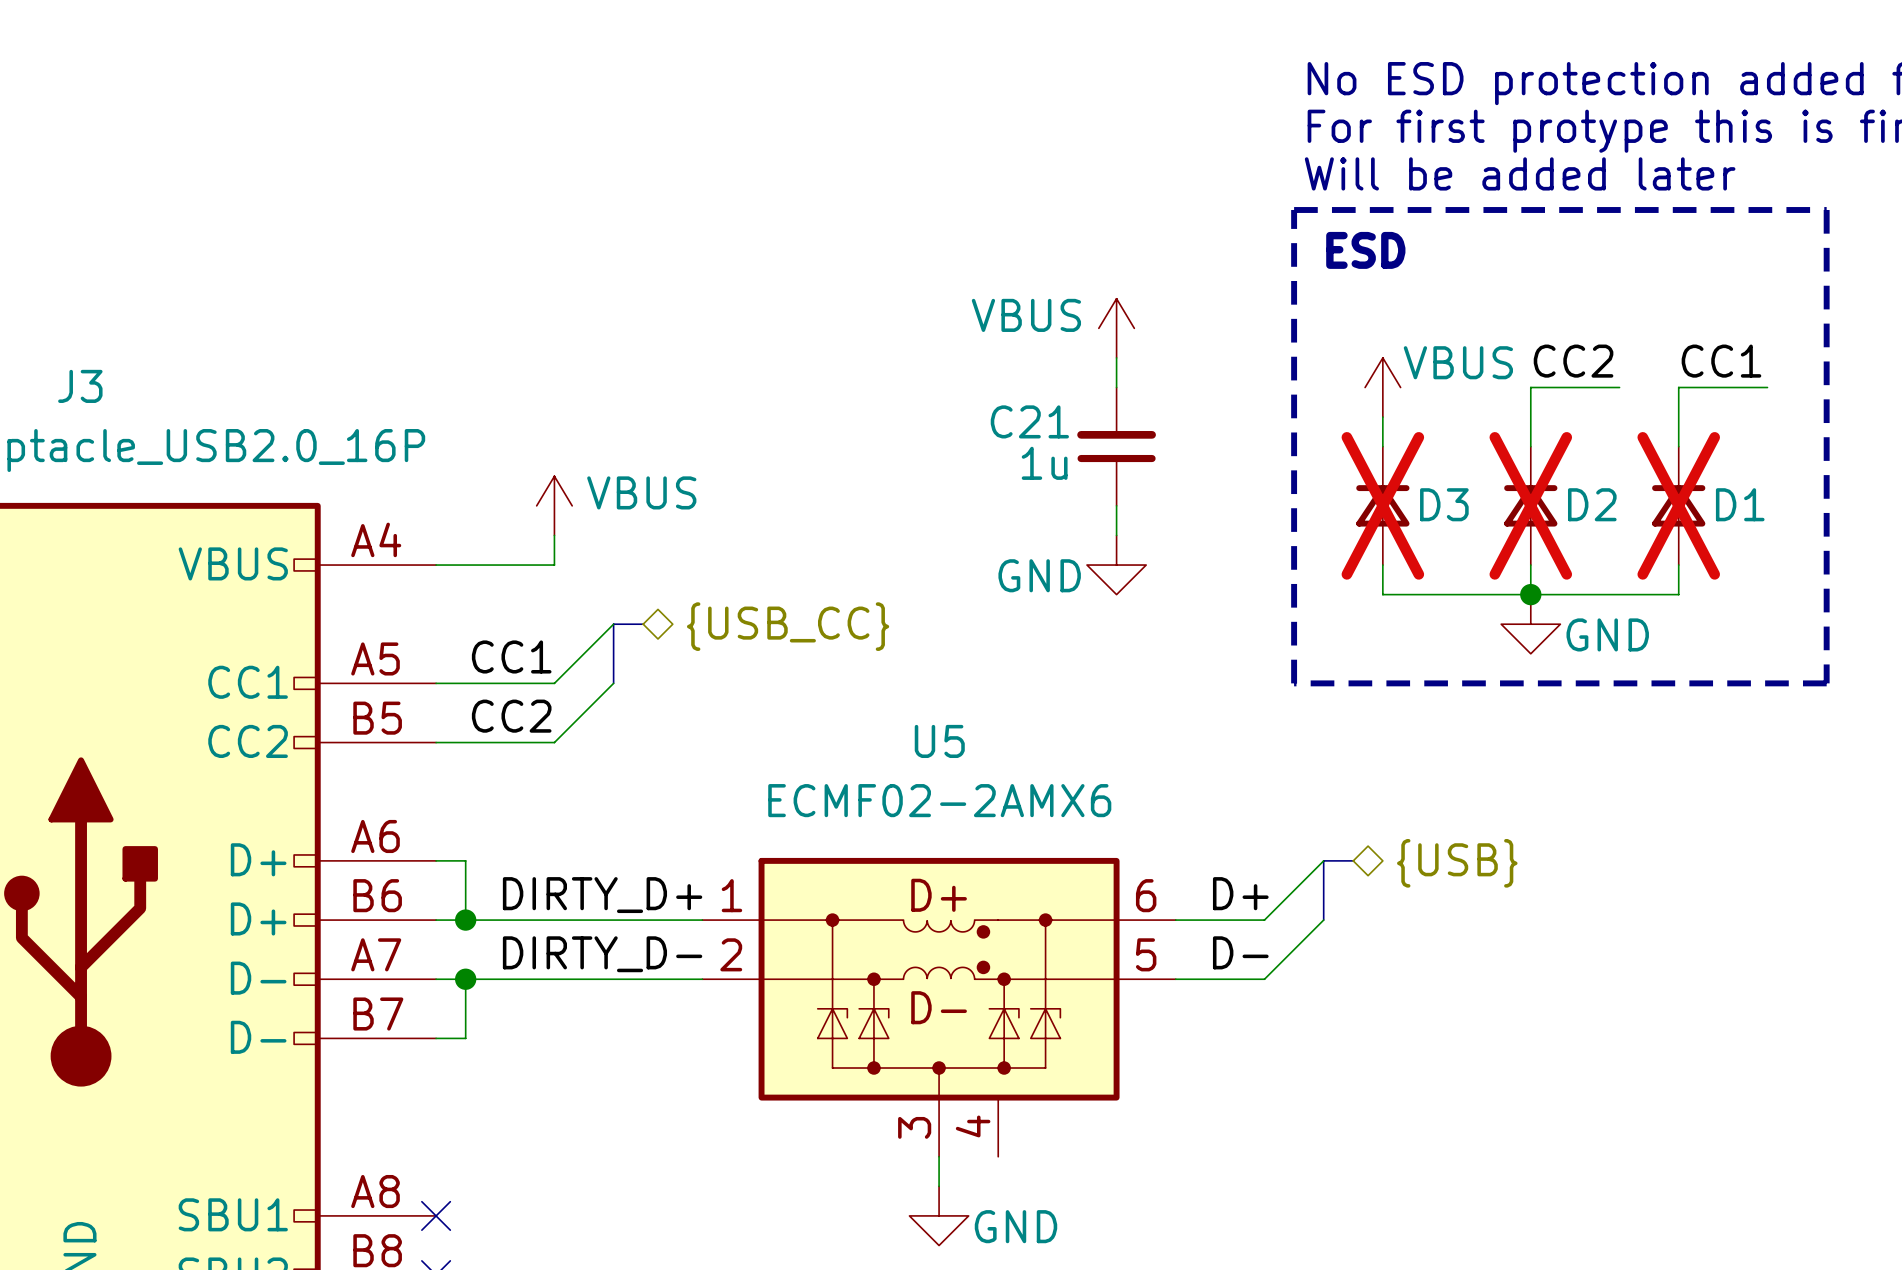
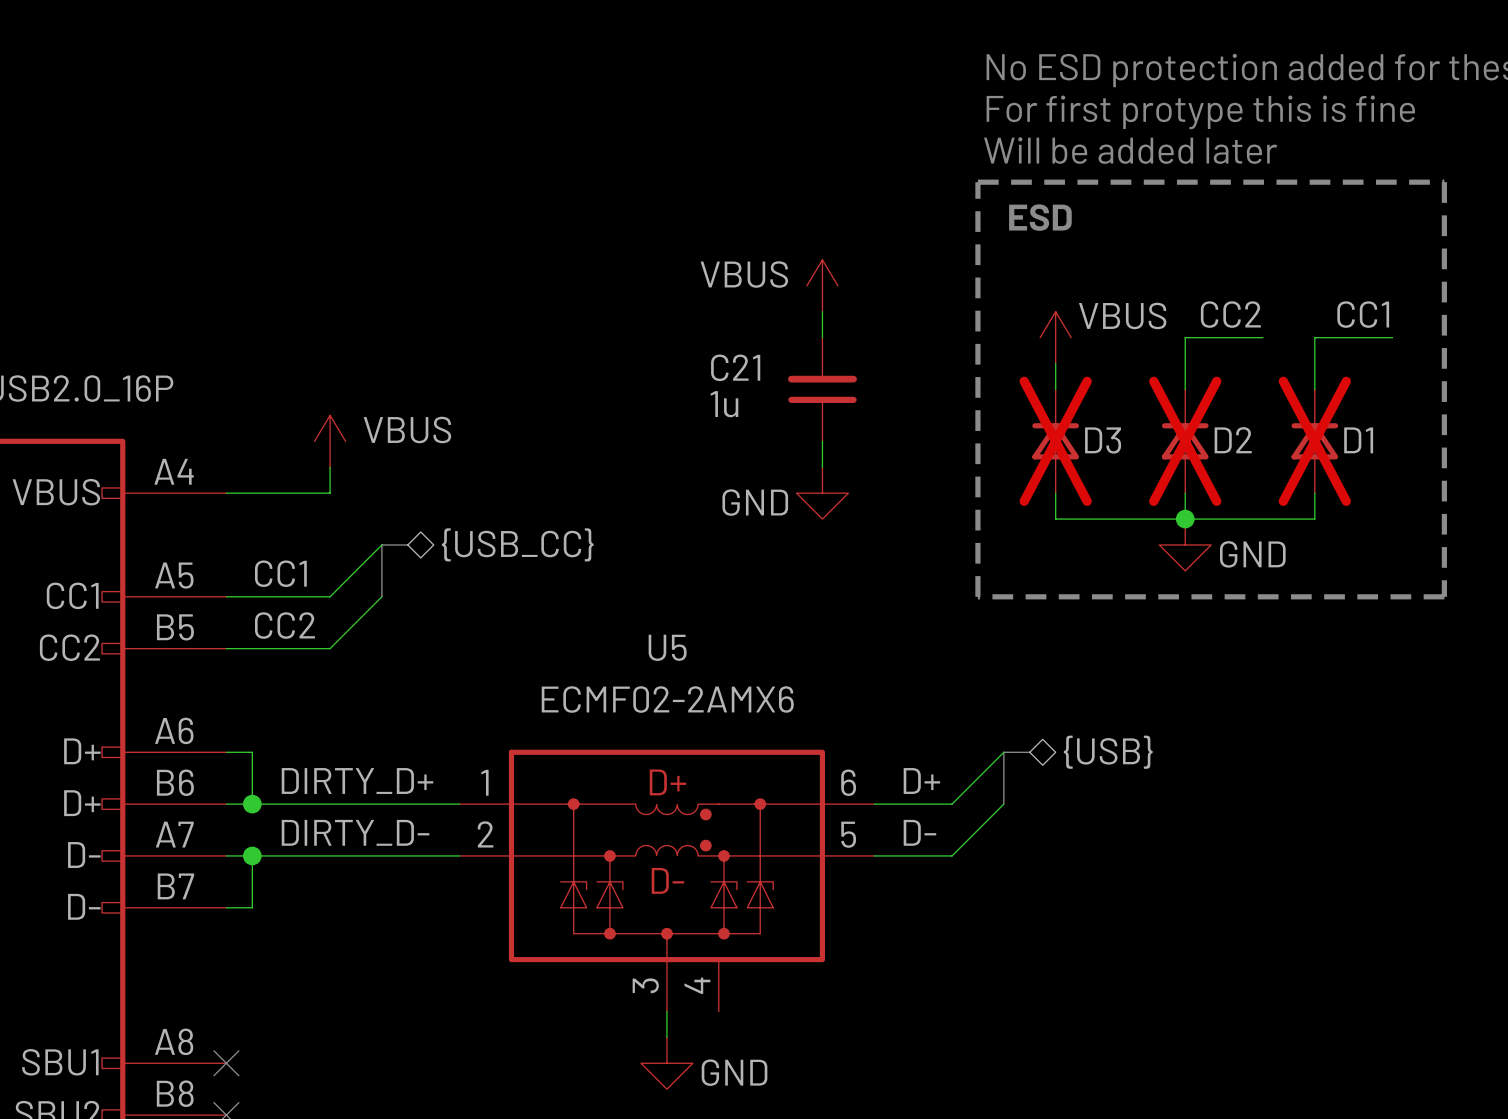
C21 name position: C21 (1029, 421) -> C21 (735, 367)
C21 value position: 1u (1044, 463) -> 1u (724, 404)

